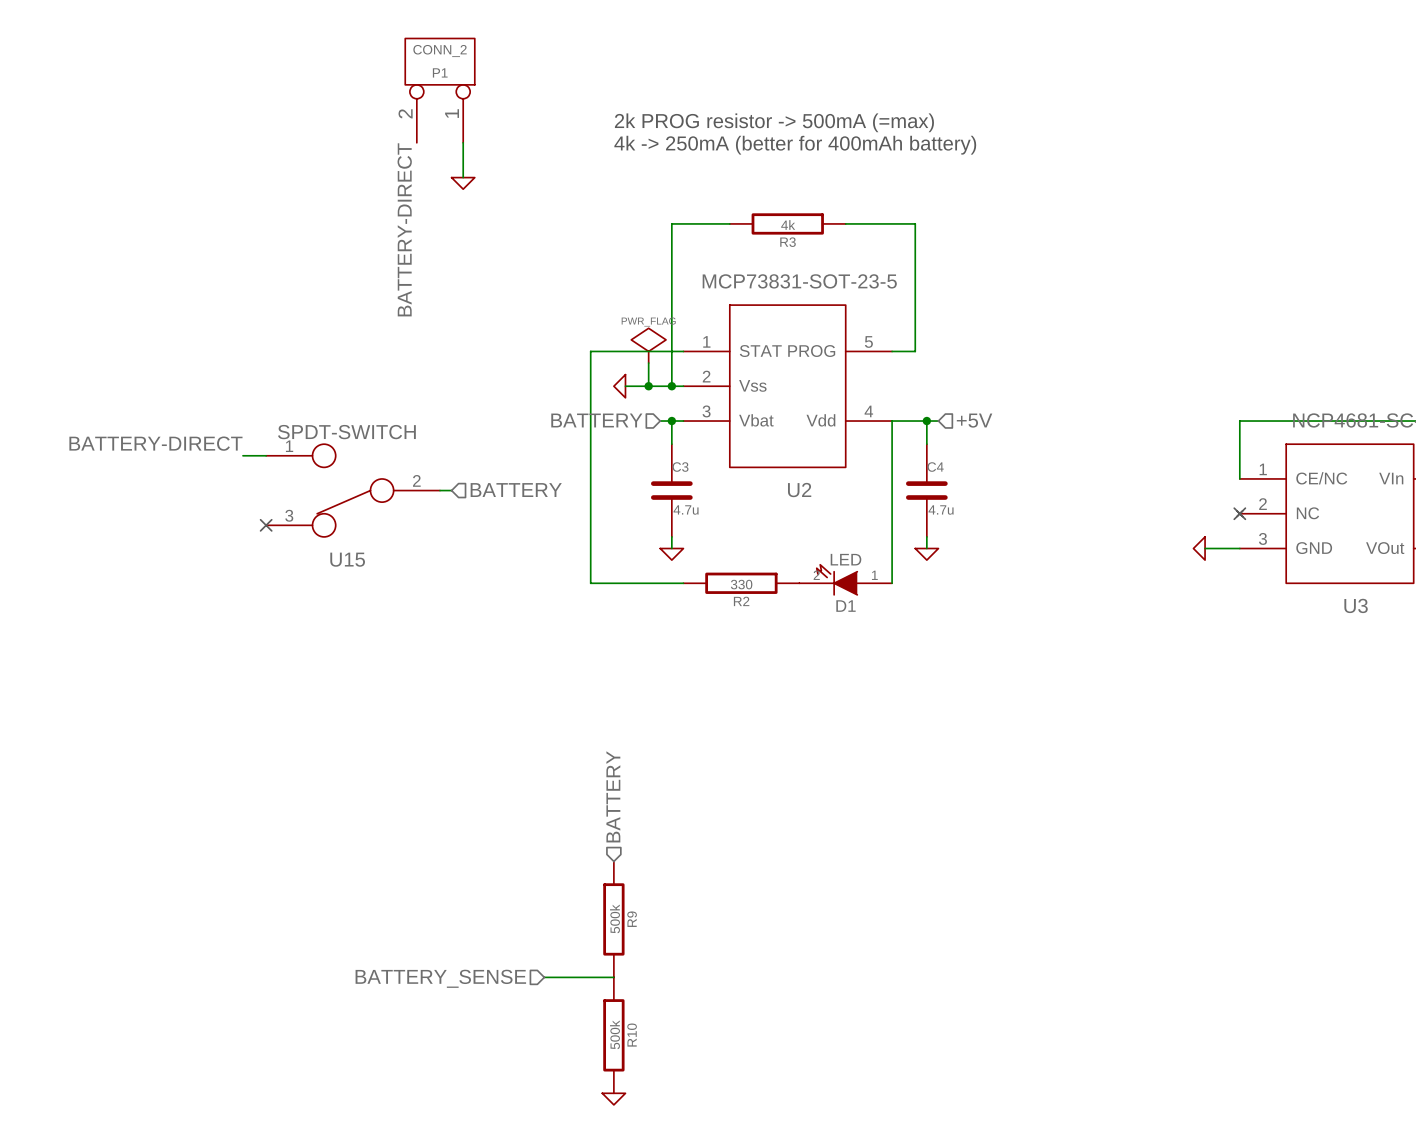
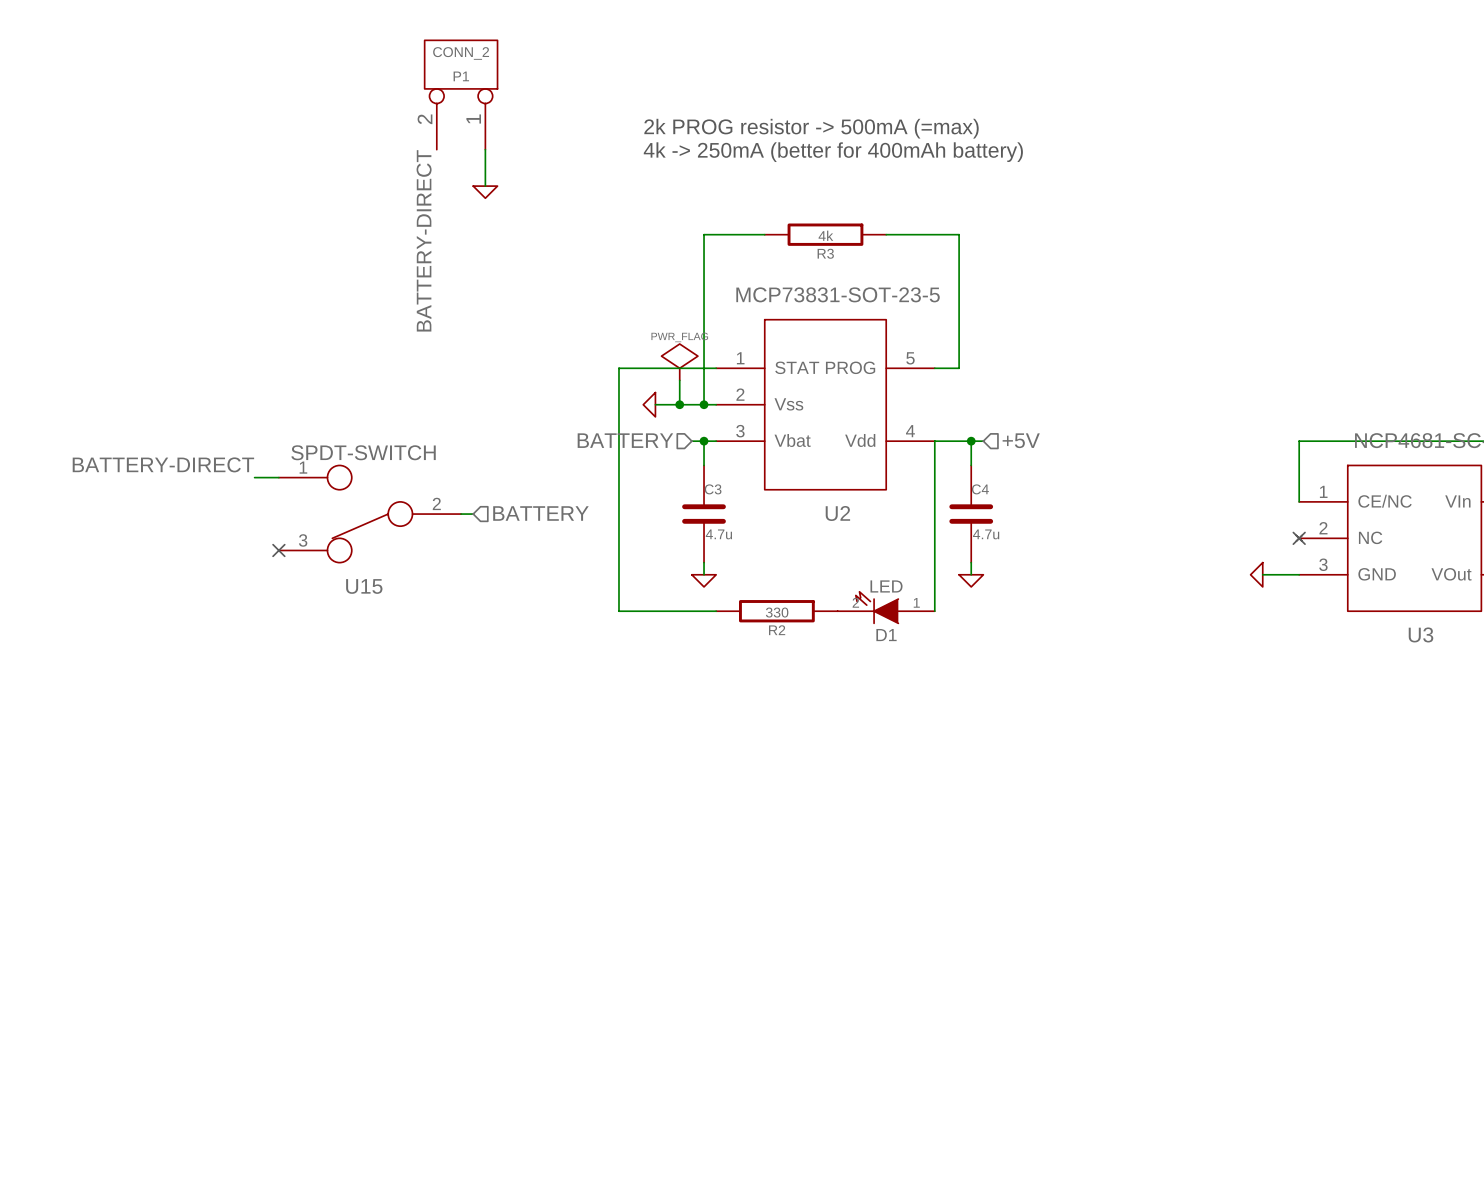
hierarchical label: BATTERY (613, 796) -> none
R9: 500k (613, 919) -> none
wire: (544, 977) (613, 977) -> none
hierarchical label: BATTERY_SENSE (440, 978) -> none
R10: 500k (613, 1035) -> none
power symbol: (613, 1099) -> none

